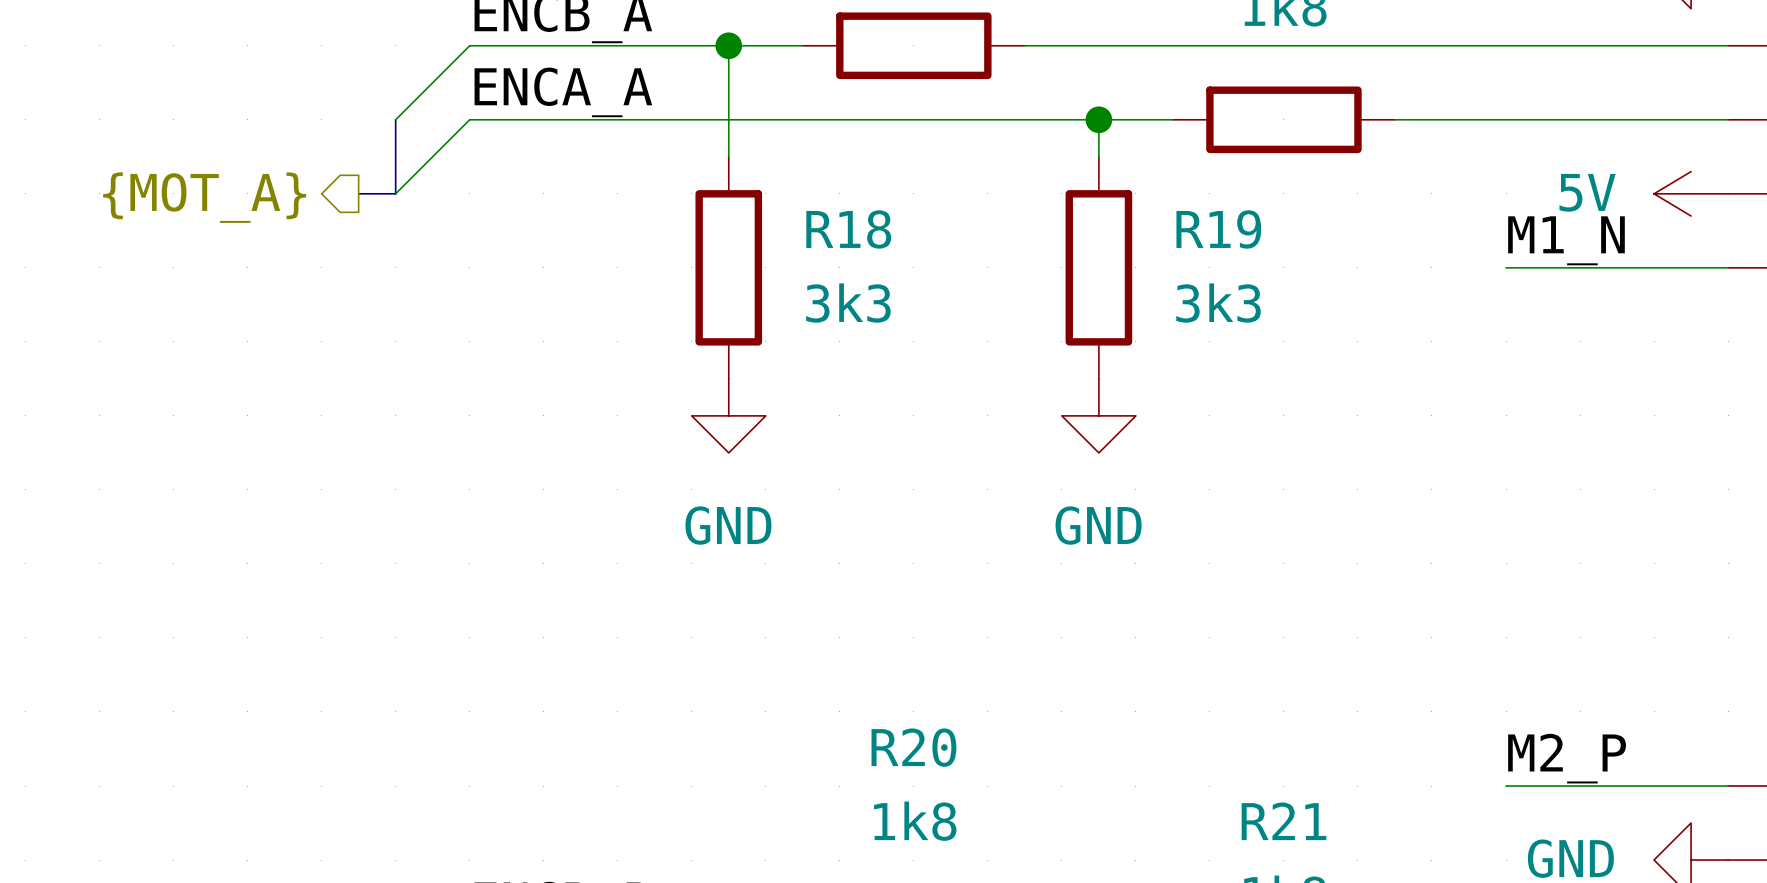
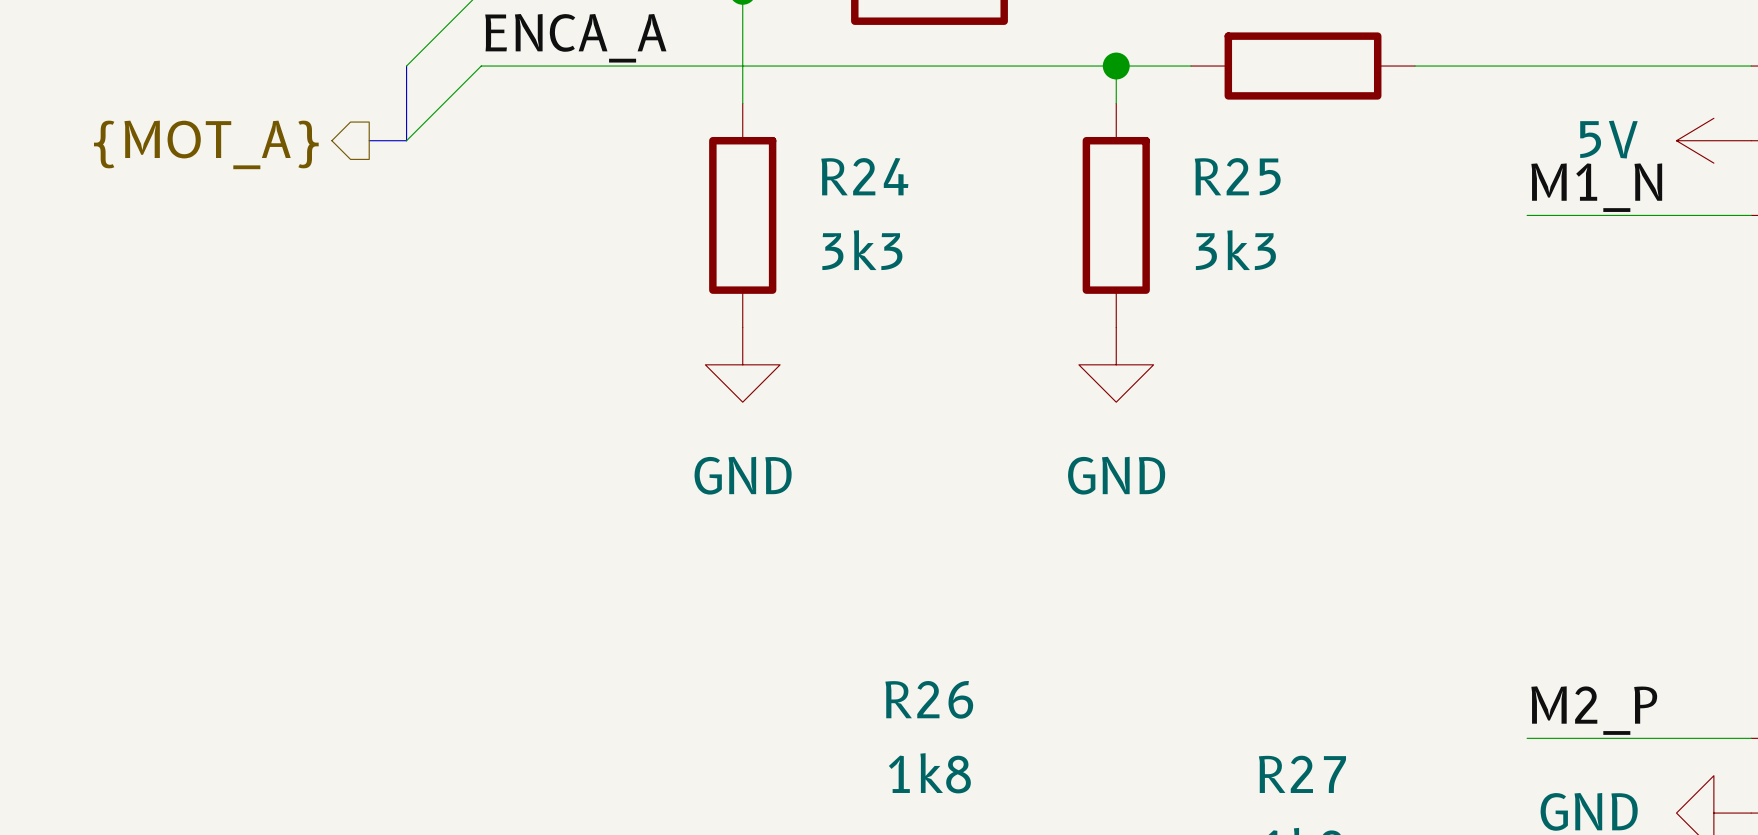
R18 name: R18 (848, 229) -> R24 (864, 176)
R19 name: R19 (1218, 229) -> R25 (1237, 176)
R20 name: R20 (913, 747) -> R26 (929, 699)
R21 name: R21 (1283, 821) -> R27 (1302, 774)

